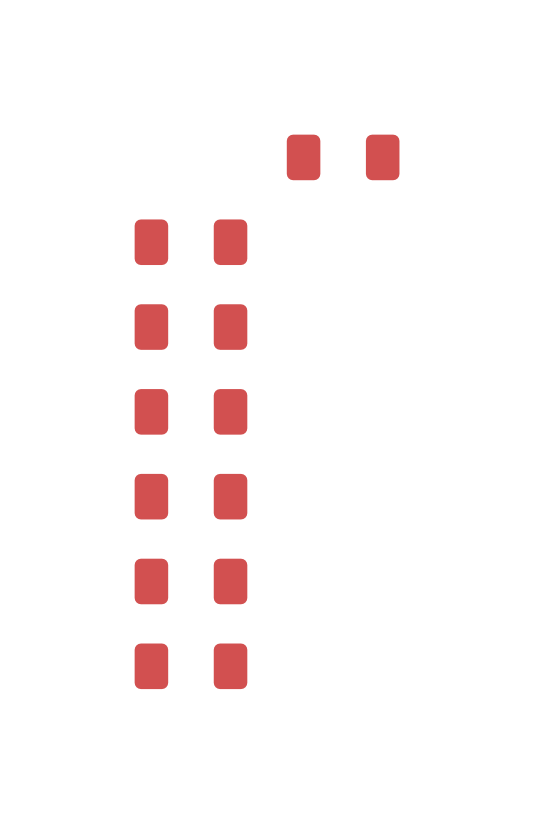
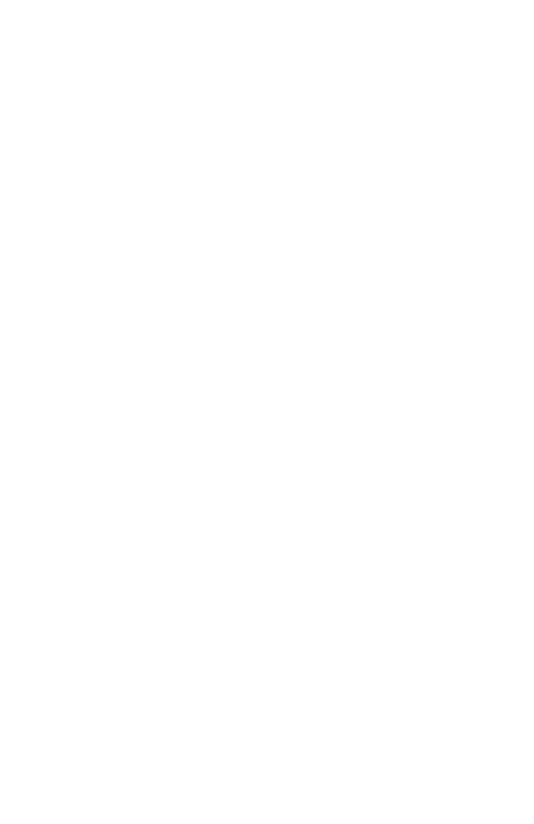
part: (343, 157) -> none
part: (190, 242) -> none
part: (190, 327) -> none
part: (190, 411) -> none
part: (190, 496) -> none
part: (190, 581) -> none
part: (190, 666) -> none

